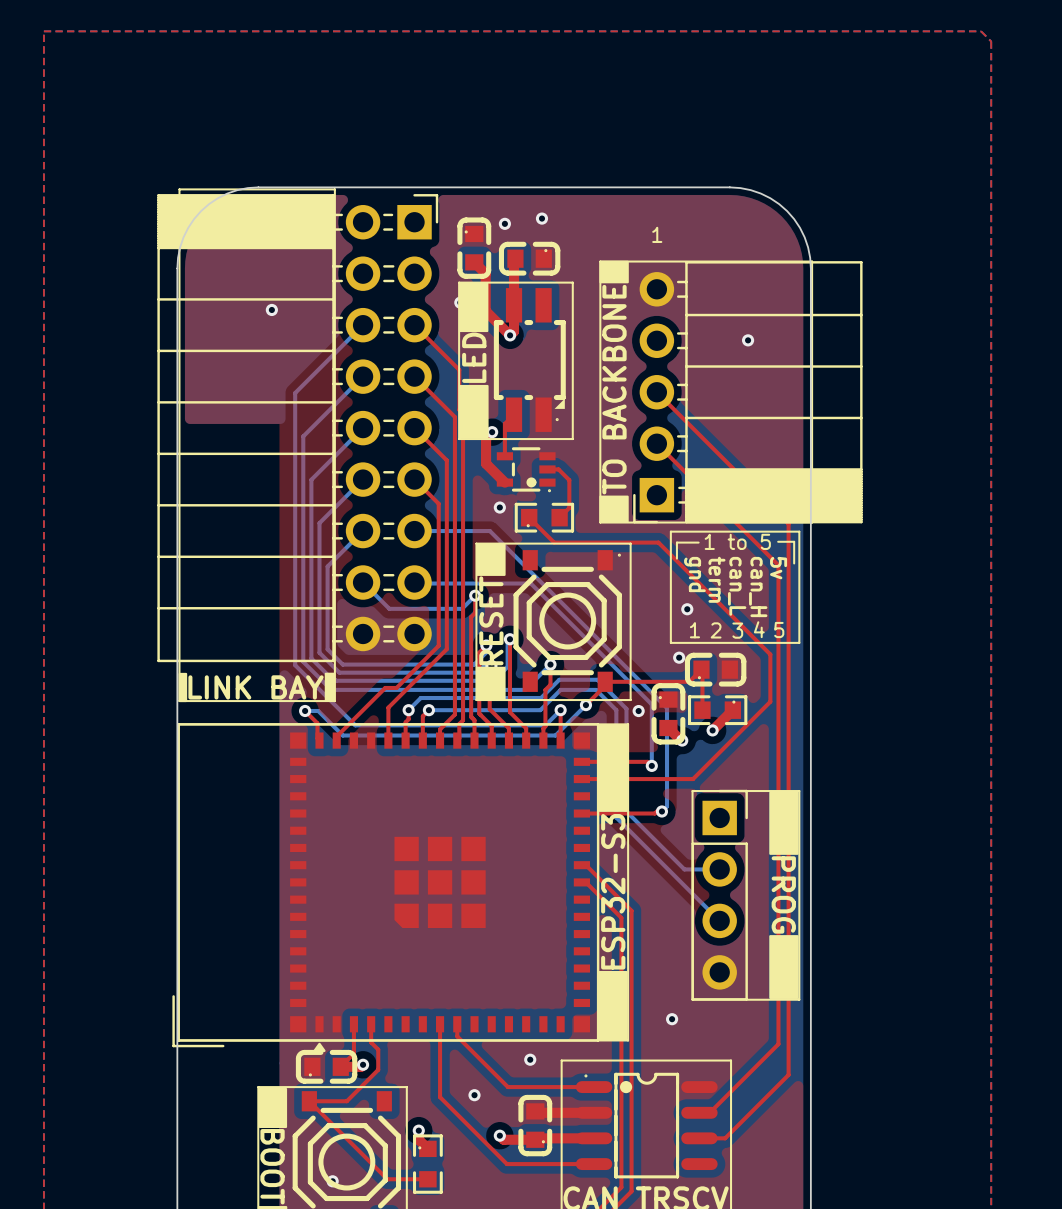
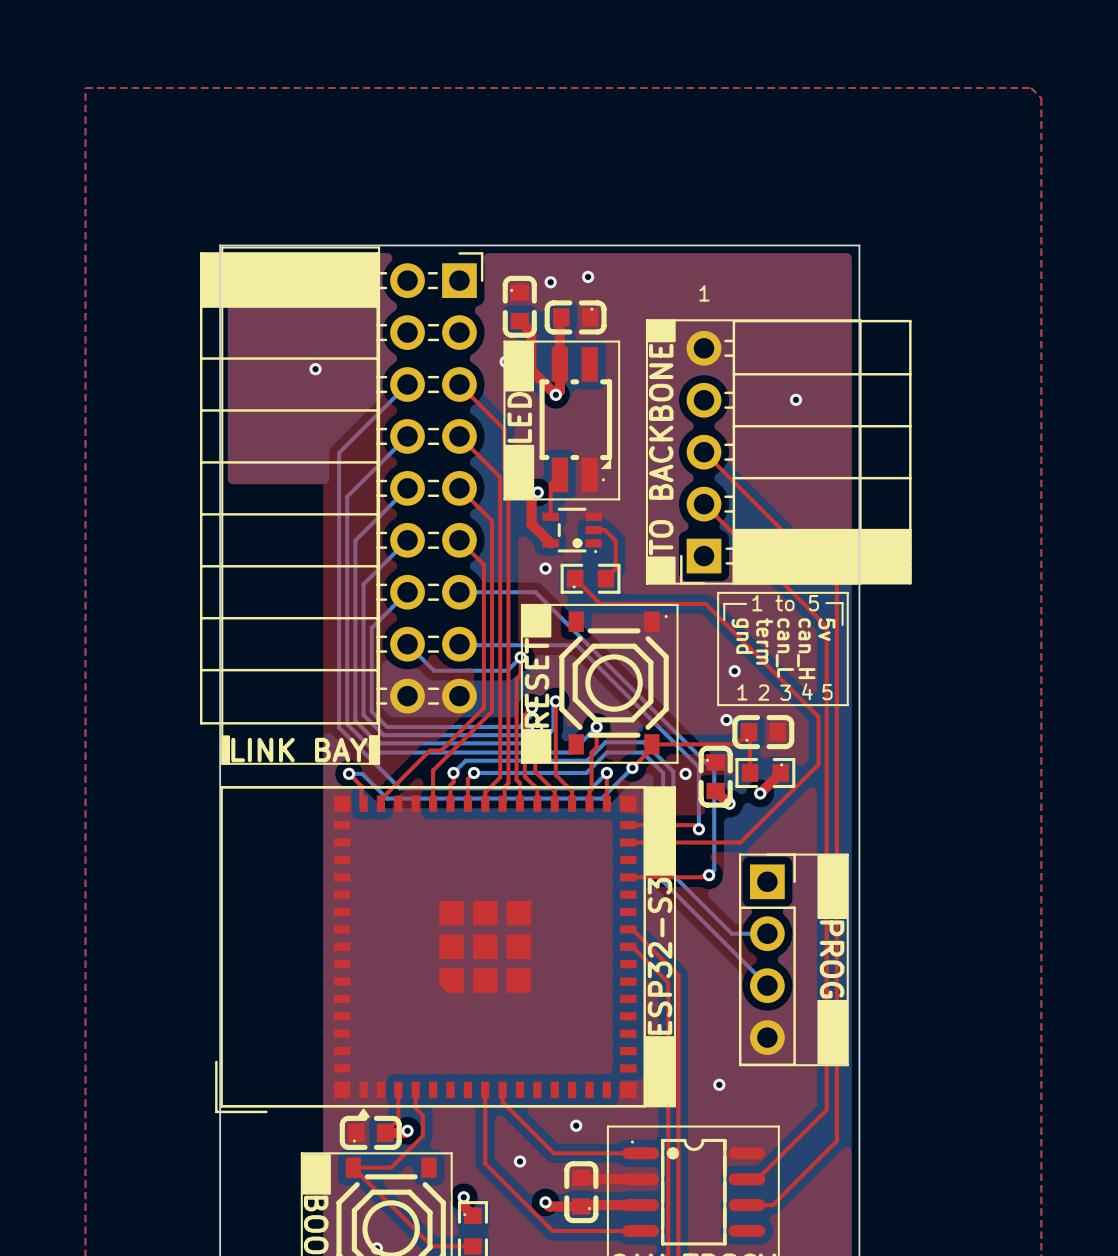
board edge: (258, 187) (227, 193) (201, 211) (183, 237) (177, 268) -> (301, 245) (220, 245) (220, 327)
board edge: (729, 187) (760, 193) (787, 211) (804, 237) (810, 268) -> (777, 245) (859, 245) (859, 327)

